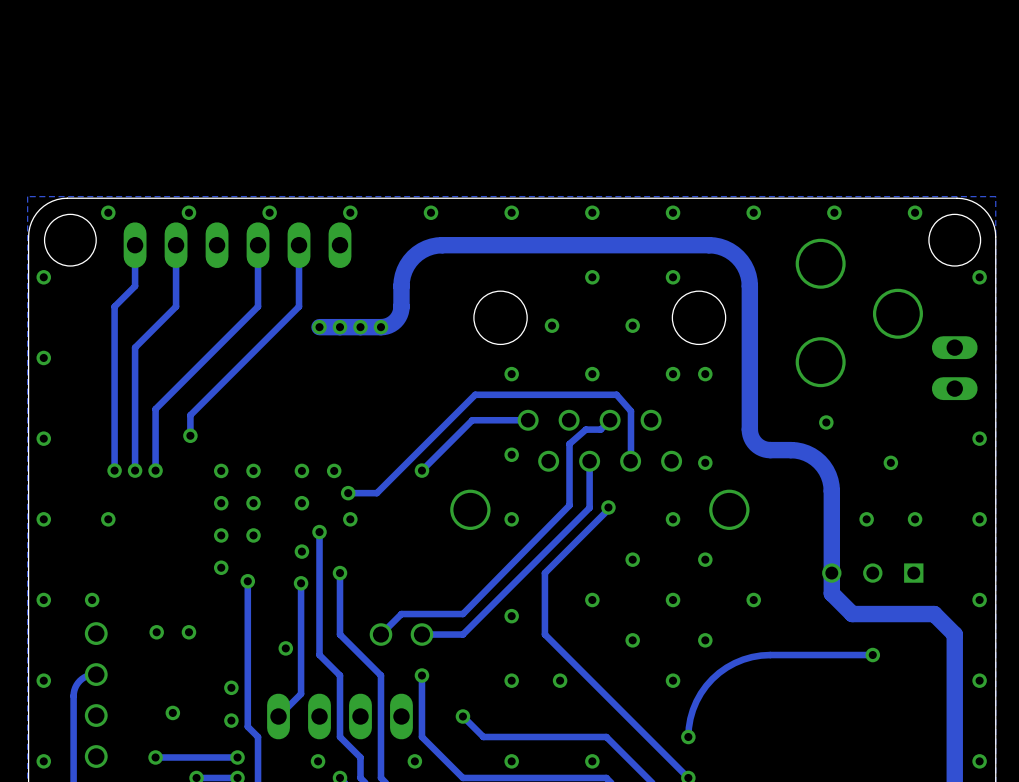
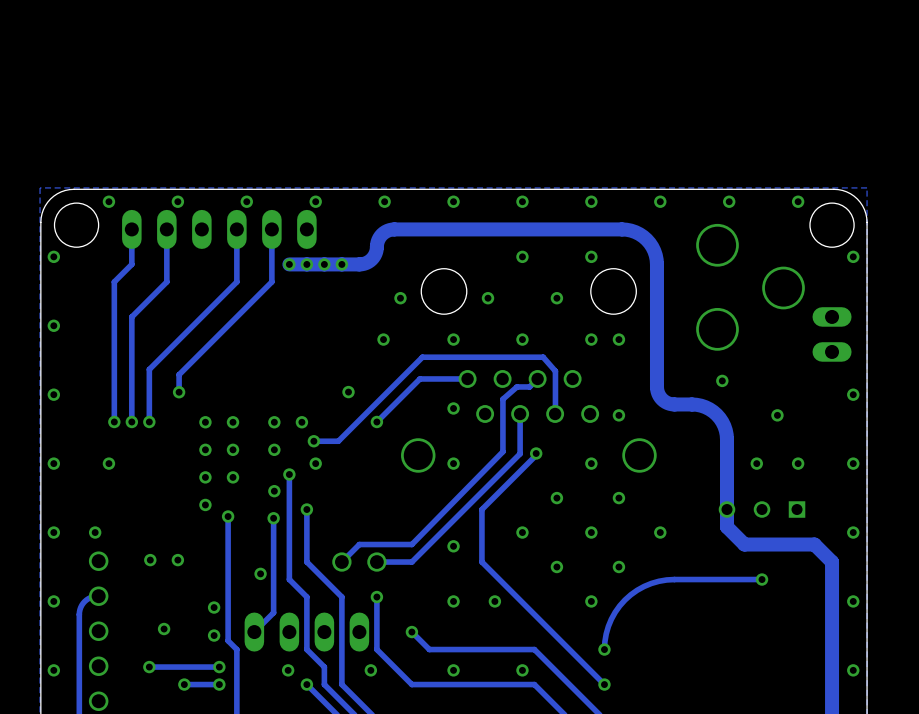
track: (442, 245) (421, 250) (406, 265) (401, 280) (400, 311) (397, 319) (391, 324) (380, 327) (319, 327) -> (394, 229) (382, 234) (378, 240) (374, 255) (363, 263) (289, 264)
via: none -> (289, 264)
via: none -> (306, 264)
via: none -> (324, 264)
via: none -> (341, 264)
via: none -> (400, 298)
via: (319, 327) -> none
via: (340, 327) -> none
via: (360, 327) -> none
via: (380, 327) -> none
via: none -> (383, 339)
via: none -> (348, 392)

